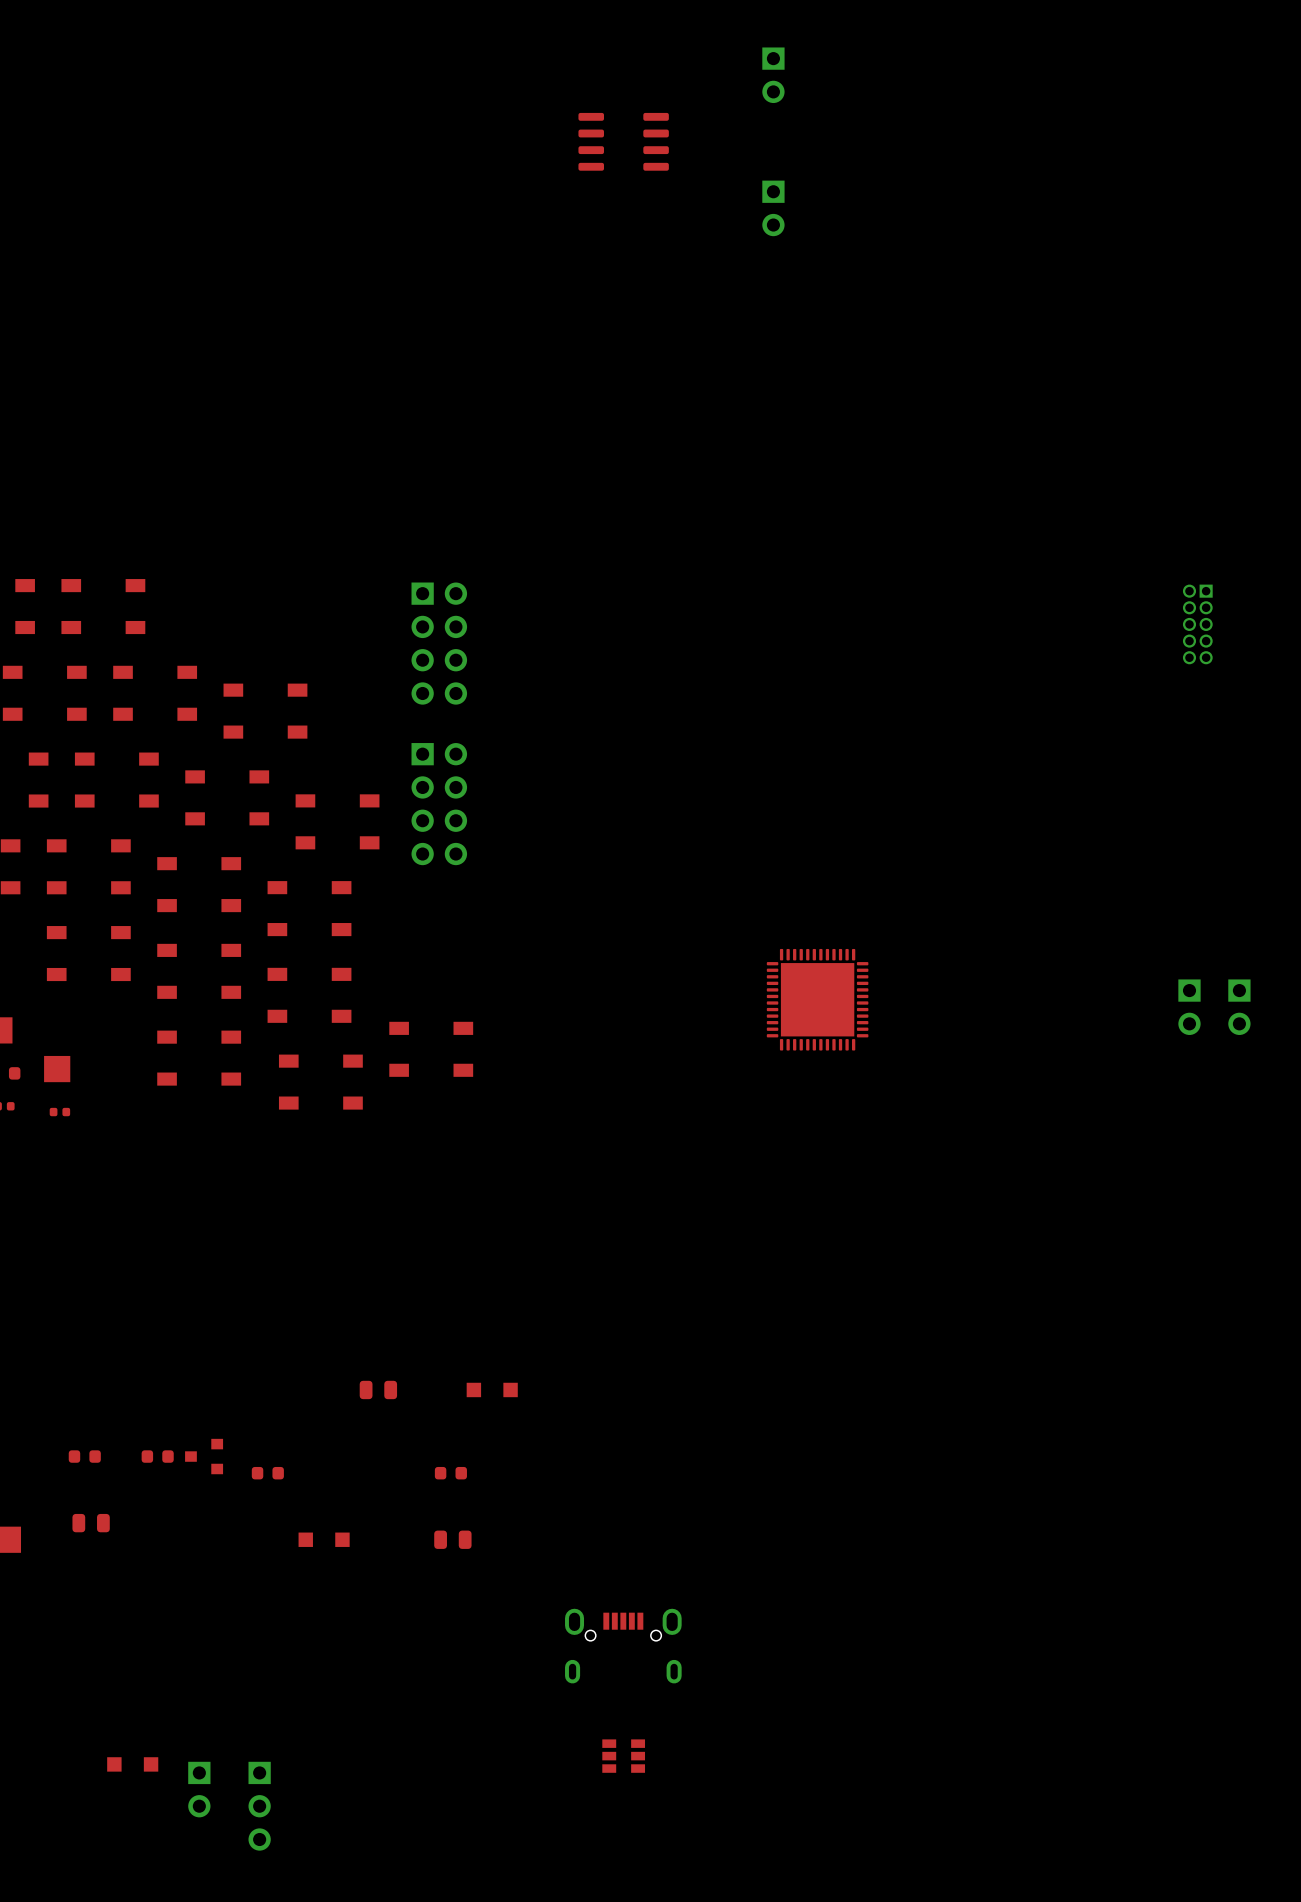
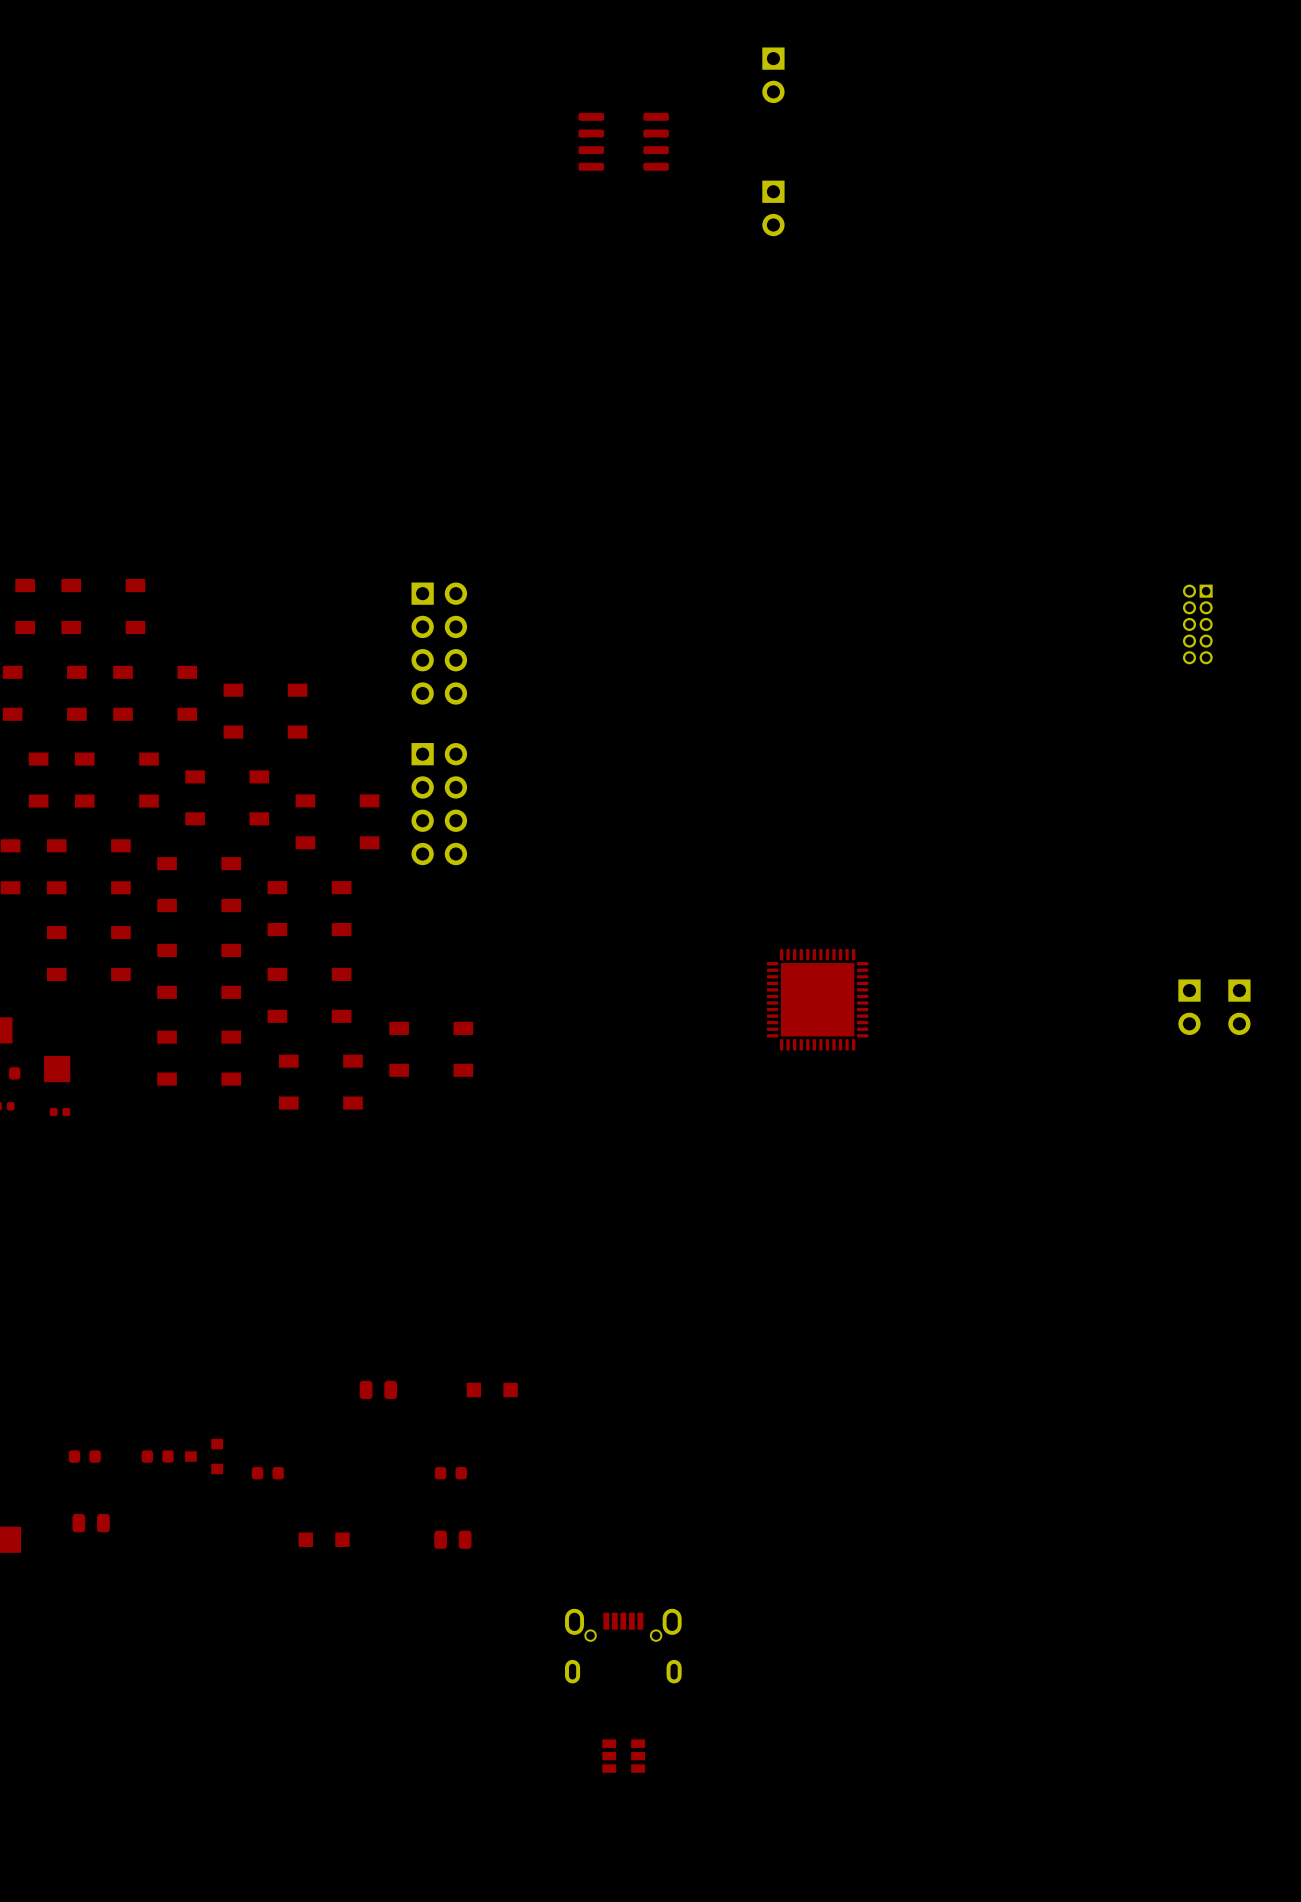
part: (132, 1764) -> none
part: (199, 1789) -> none
part: (259, 1806) -> none

